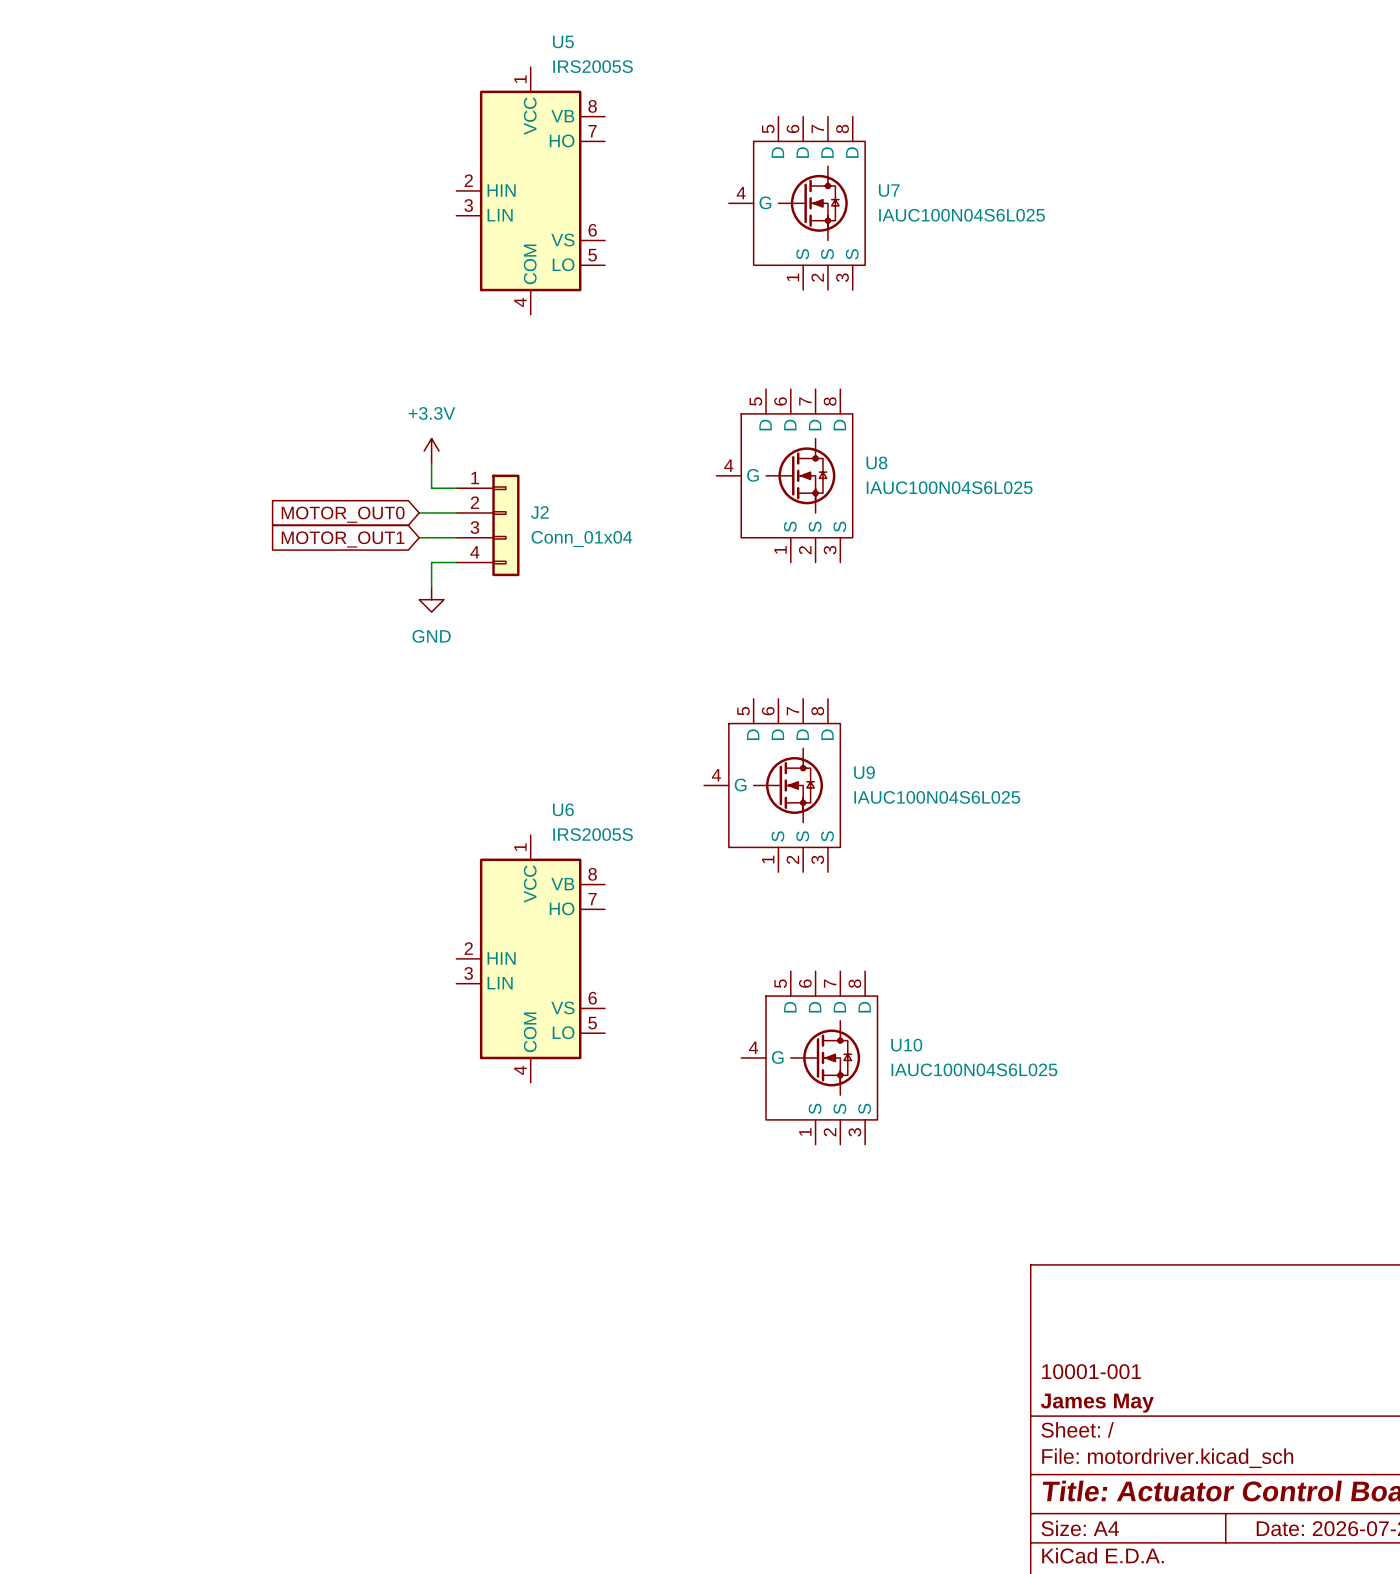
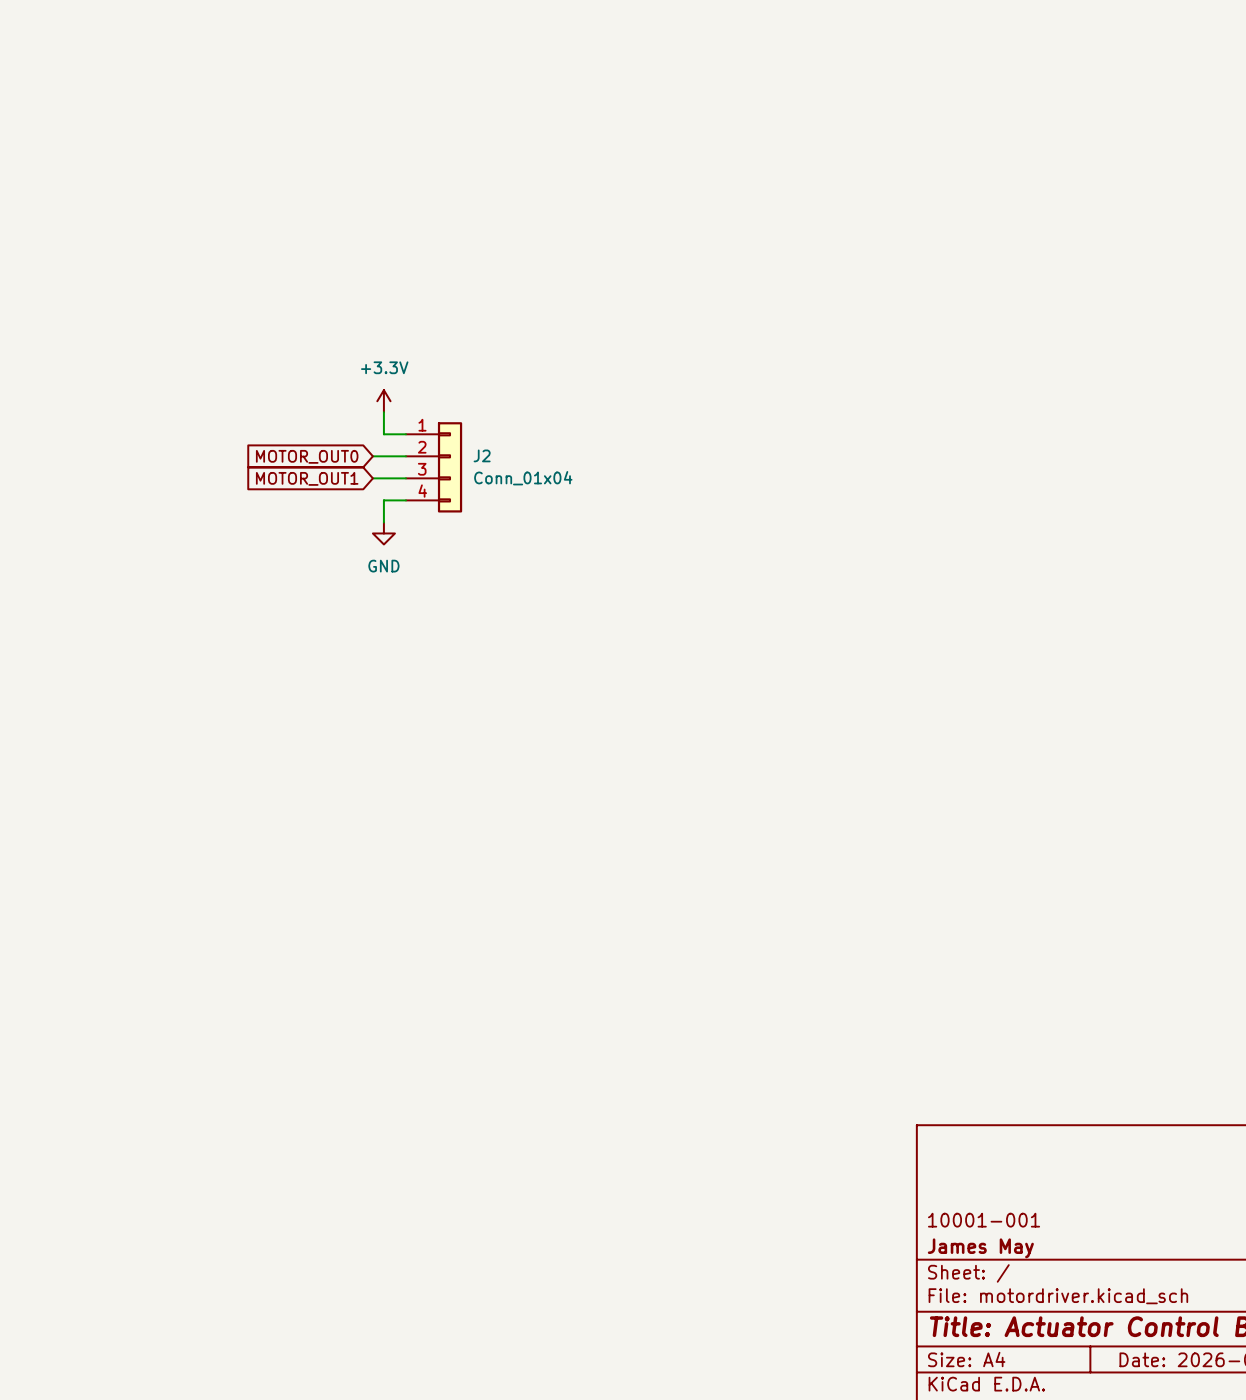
U5: IRS2005S (530, 190) -> none
U7: IAUC100N04S6L025 (796, 203) -> none
U8: IAUC100N04S6L025 (784, 475) -> none
U9: IAUC100N04S6L025 (772, 785) -> none
U6: IRS2005S (530, 958) -> none
U10: IAUC100N04S6L025 (809, 1057) -> none

